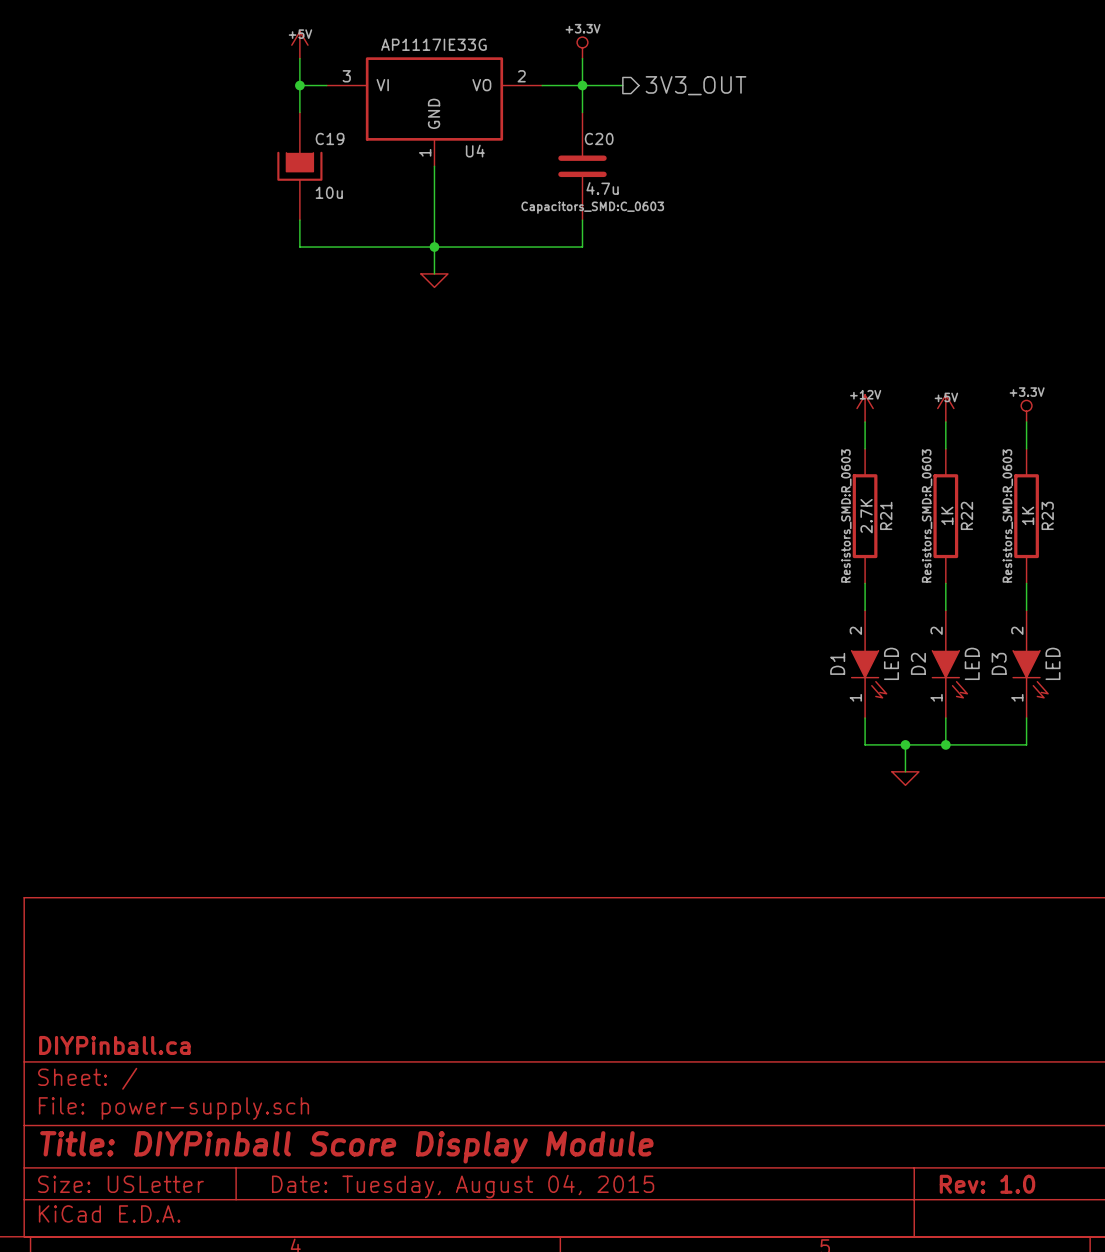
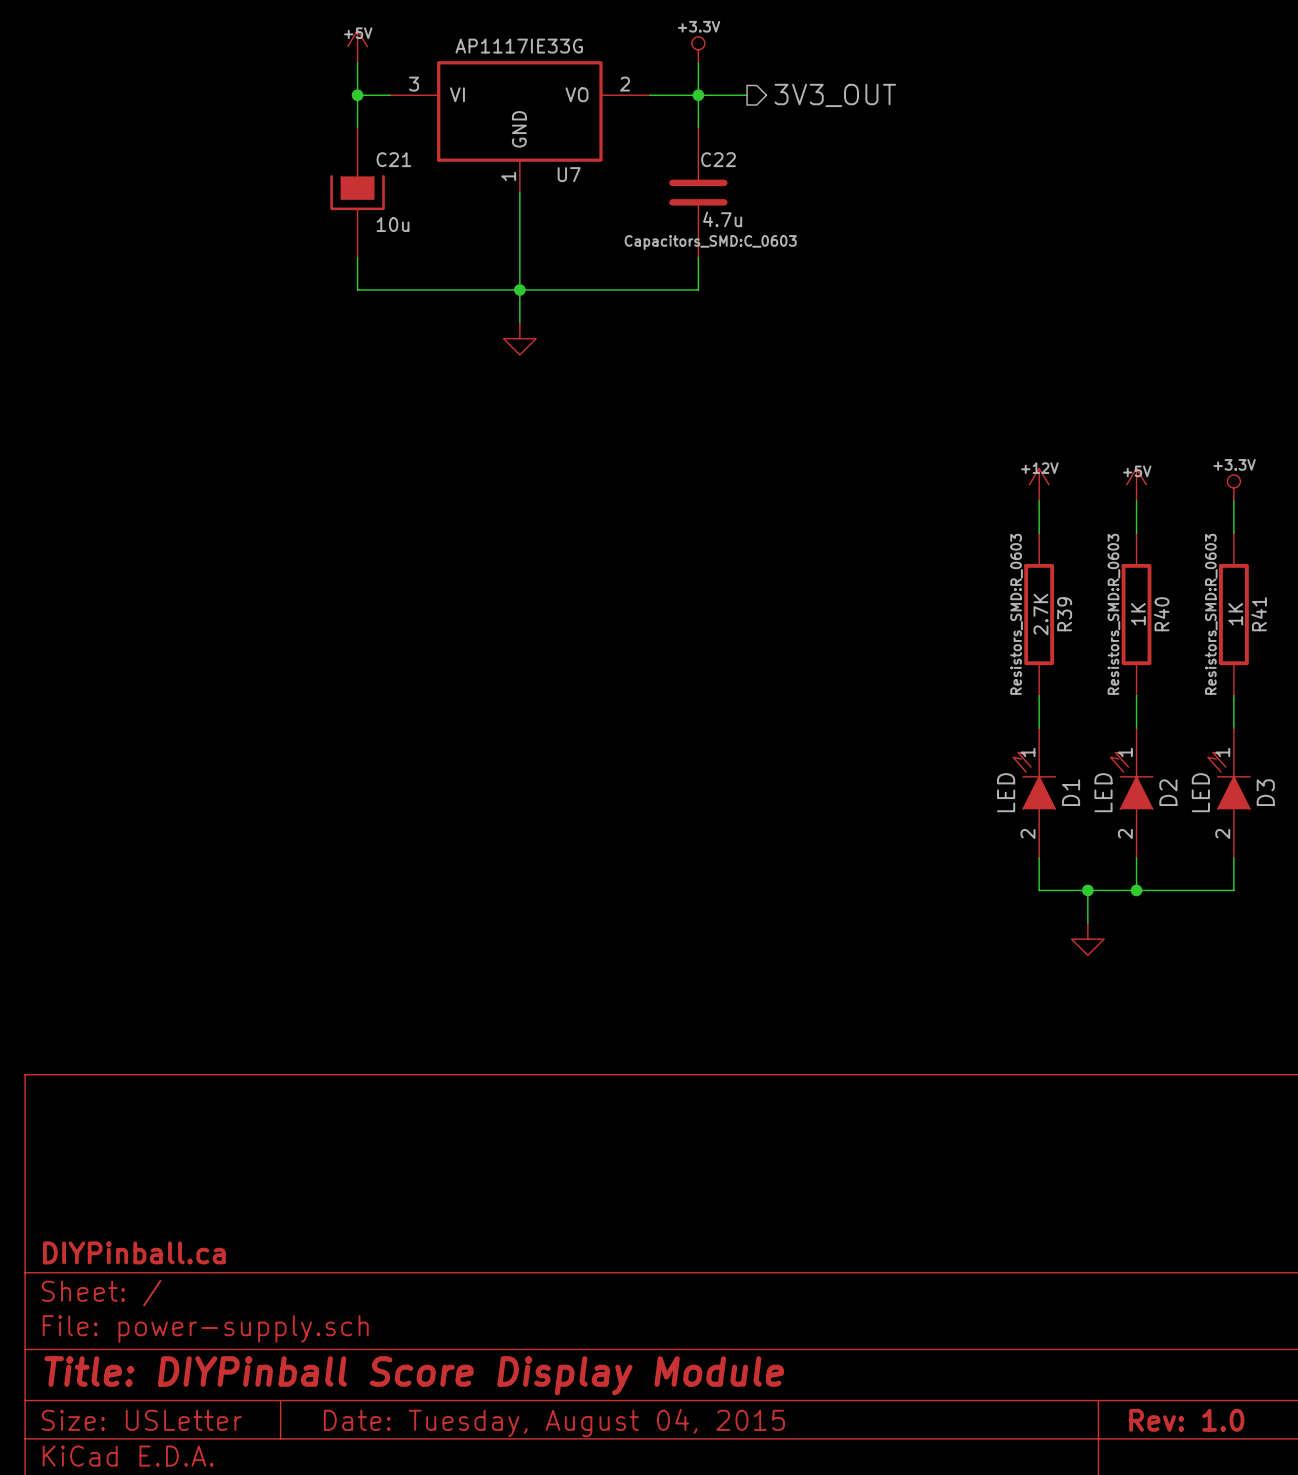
C19 name: C19 (330, 138) -> C21 (393, 159)
C20 name: C20 (599, 138) -> C22 (718, 159)
U4 name: U4 (475, 151) -> U7 (569, 174)
power symbol shape: [421, 273, 448, 288] -> [503, 322, 537, 355]
R21 name: R21 (886, 515) -> R39 (1064, 614)
R22 name: R22 (966, 515) -> R40 (1161, 614)
R23 name: R23 (1047, 515) -> R41 (1259, 614)
D1 rotation: 0° (869, 674) -> 180° (1034, 780)
D2 rotation: 0° (949, 674) -> 180° (1131, 780)
D3 rotation: 0° (1030, 674) -> 180° (1229, 780)
power symbol shape: [891, 771, 919, 786] -> [1071, 922, 1105, 956]

